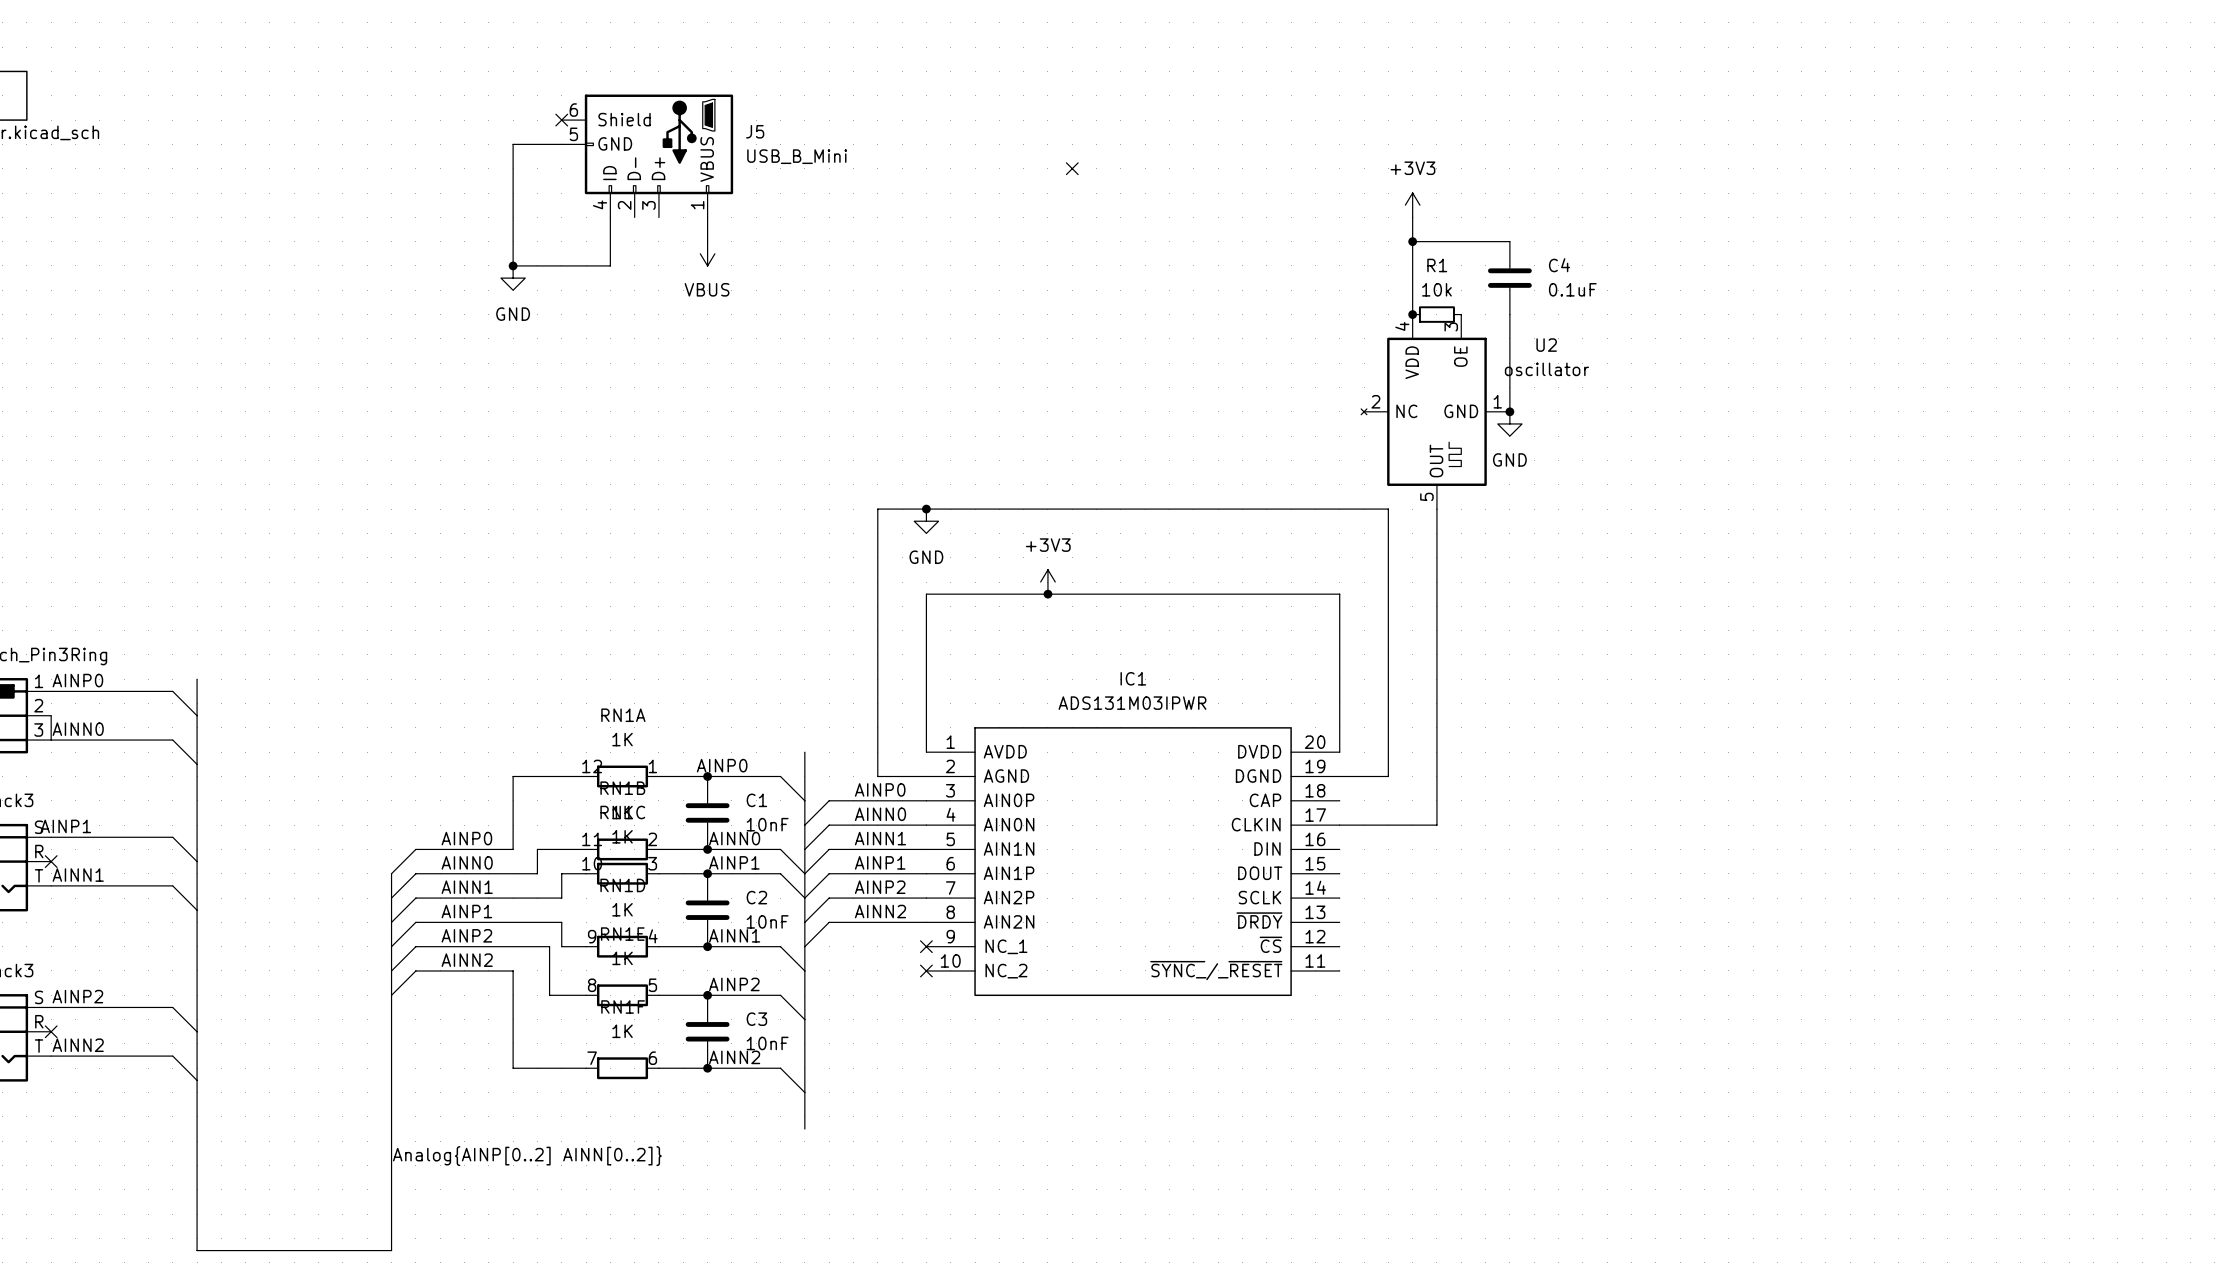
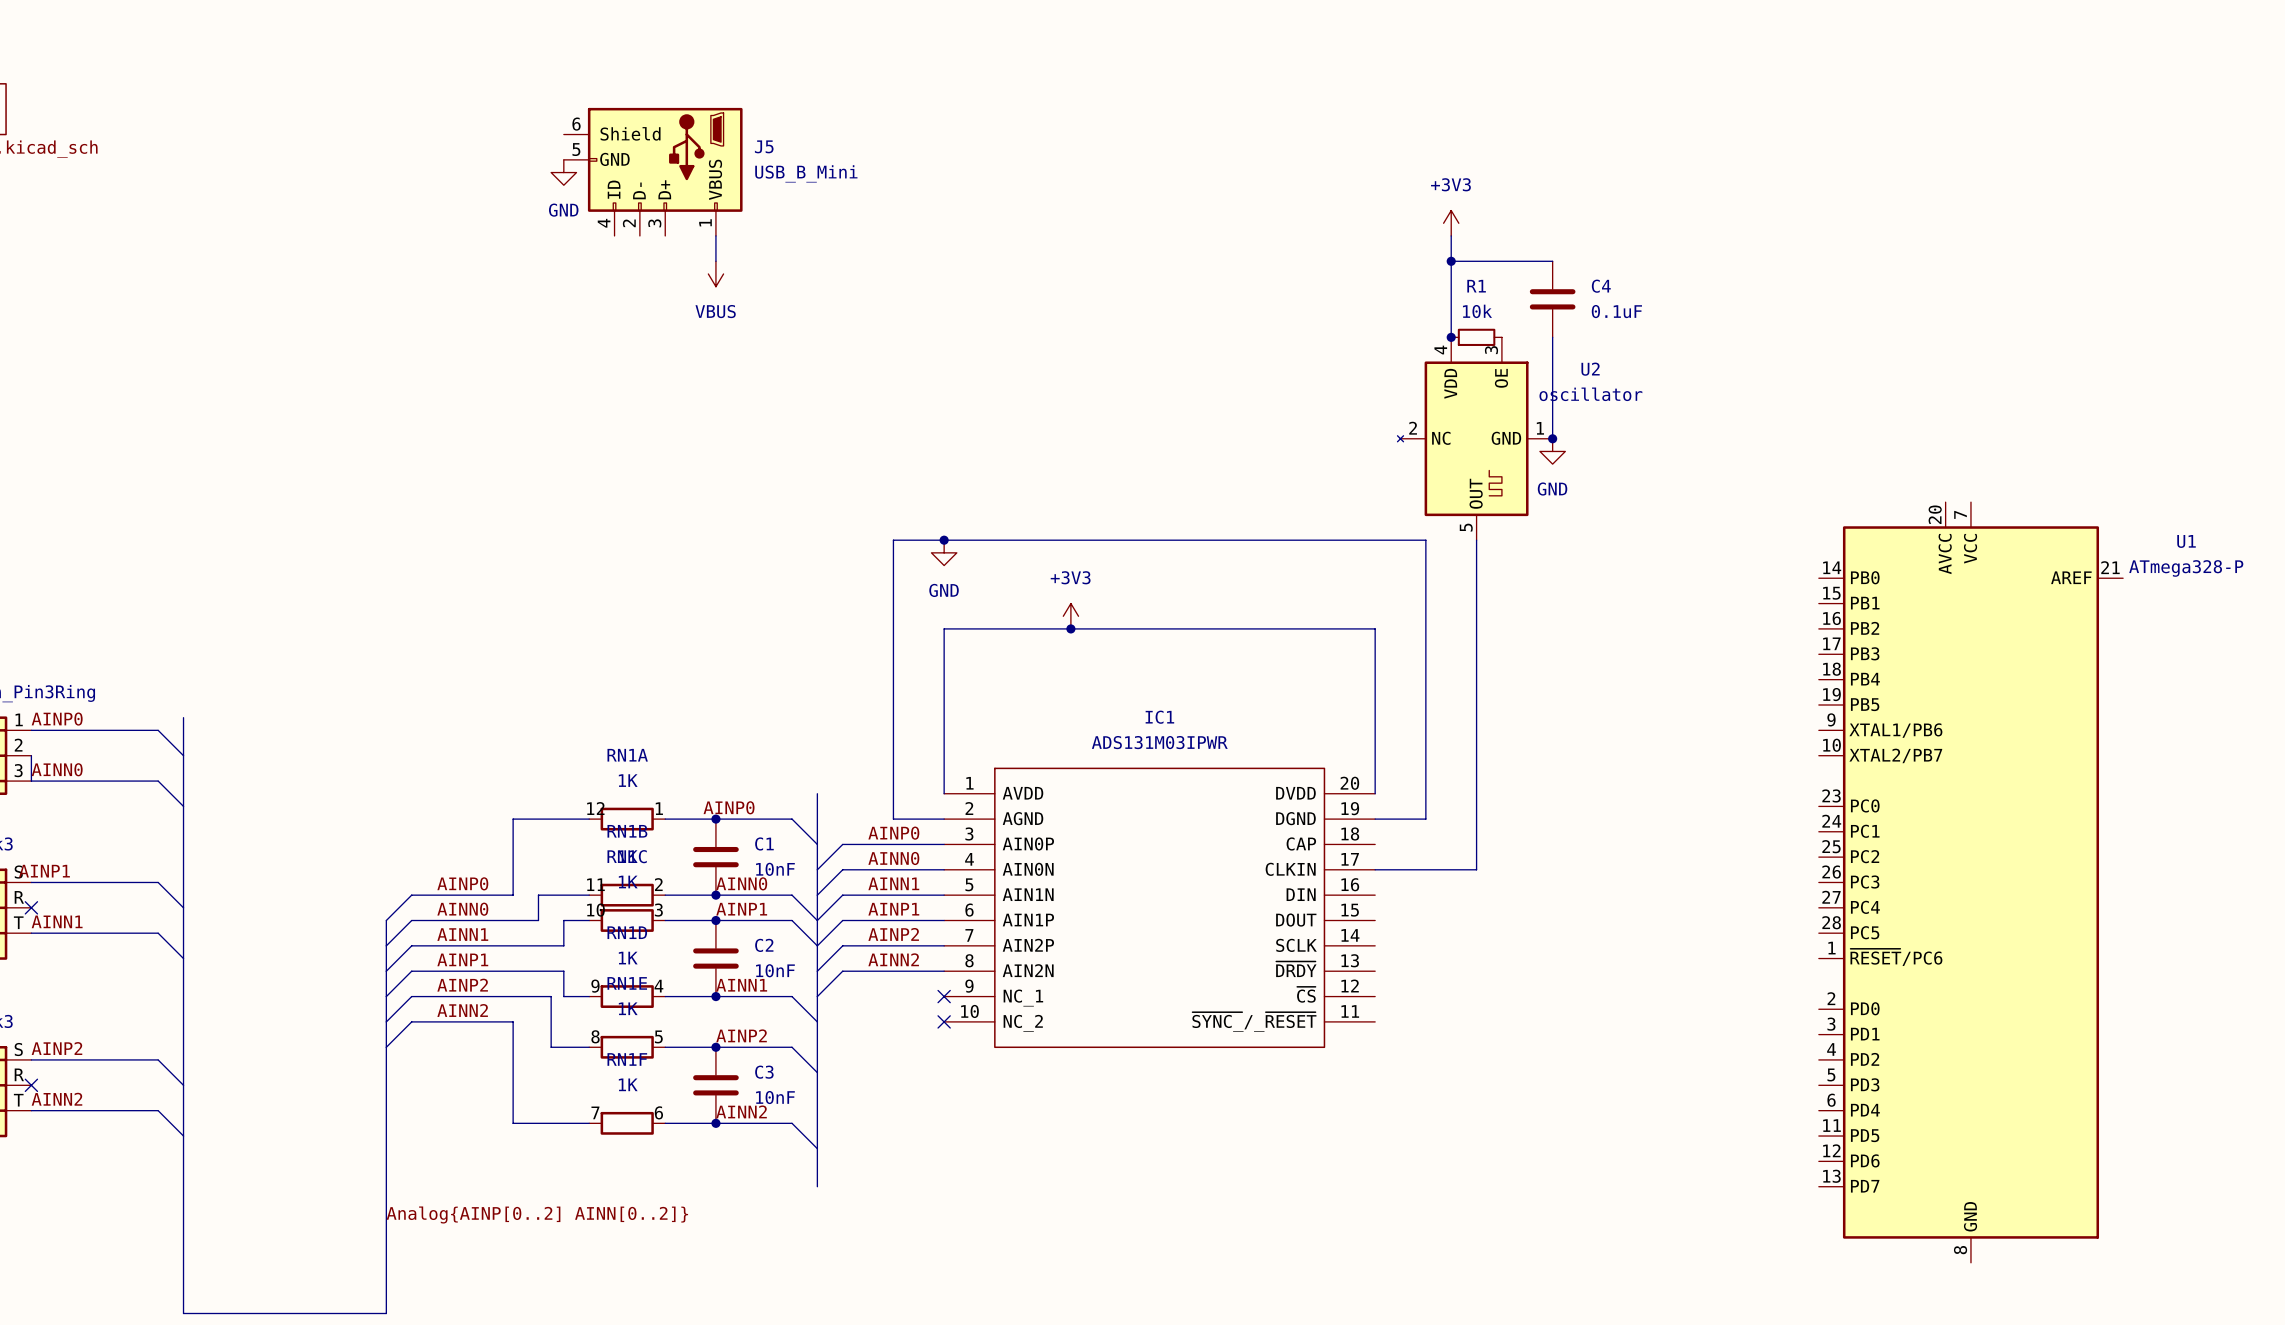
no-connect mark: (561, 120) -> none
wire: (561, 144) (513, 144) (513, 265) (610, 265) (610, 217) -> none
no-connect mark: (1072, 168) -> none
junction: (513, 265) -> none
power symbol position: GND (513, 278) -> GND (563, 172)
U1: none -> ATmega328-P (1970, 882)

